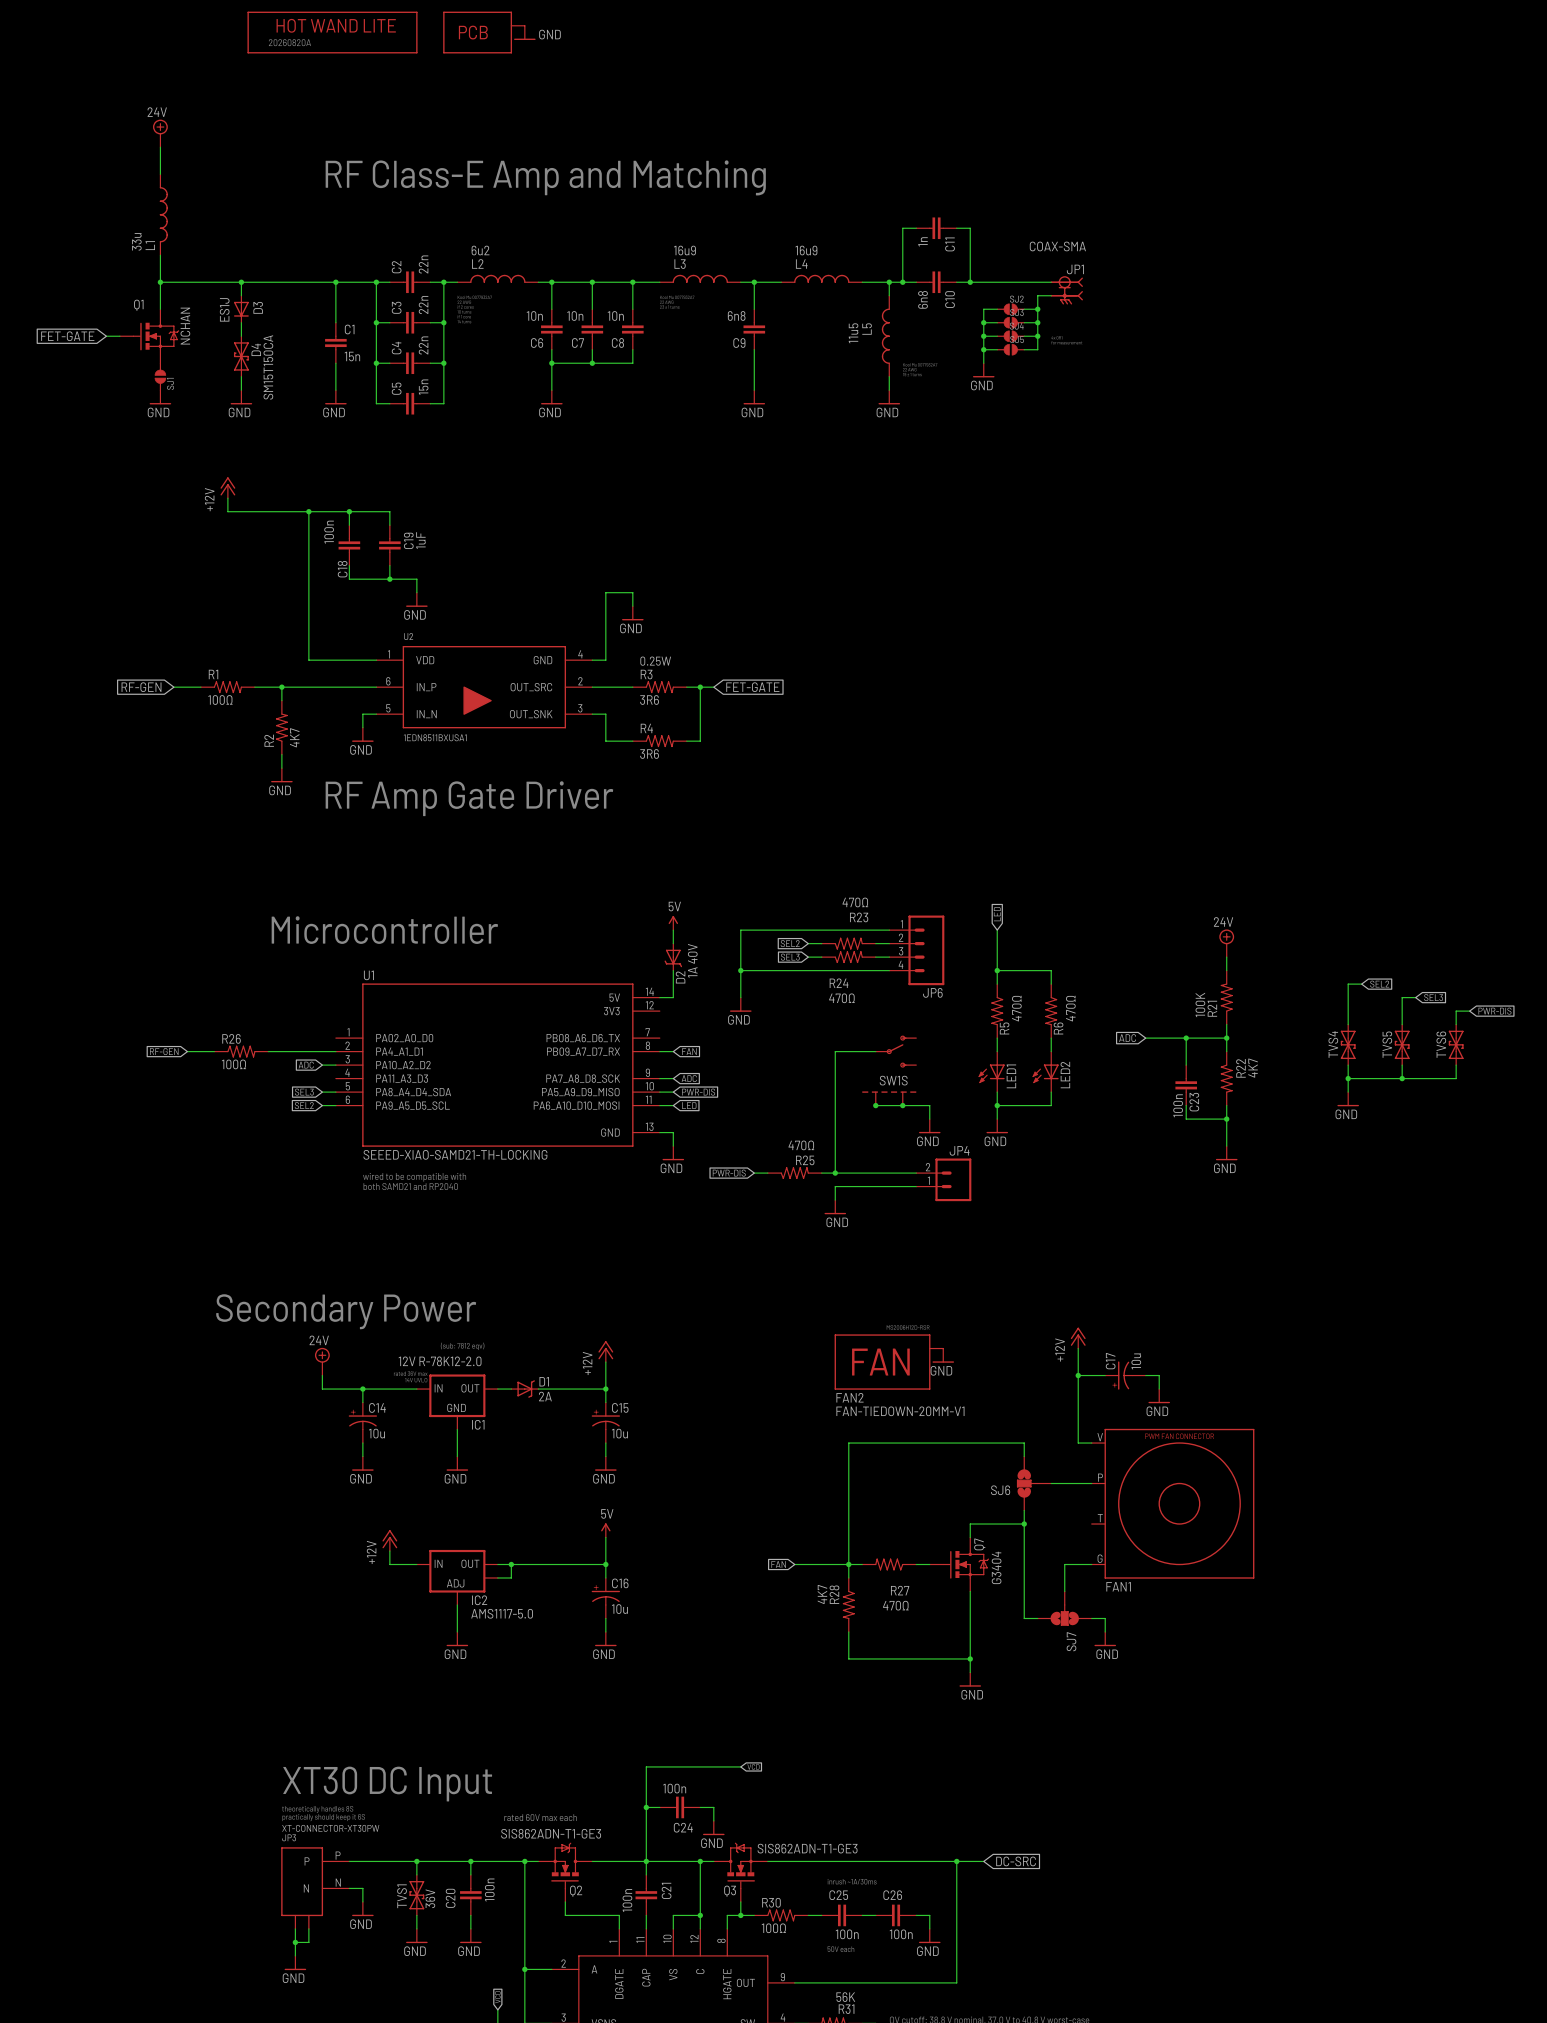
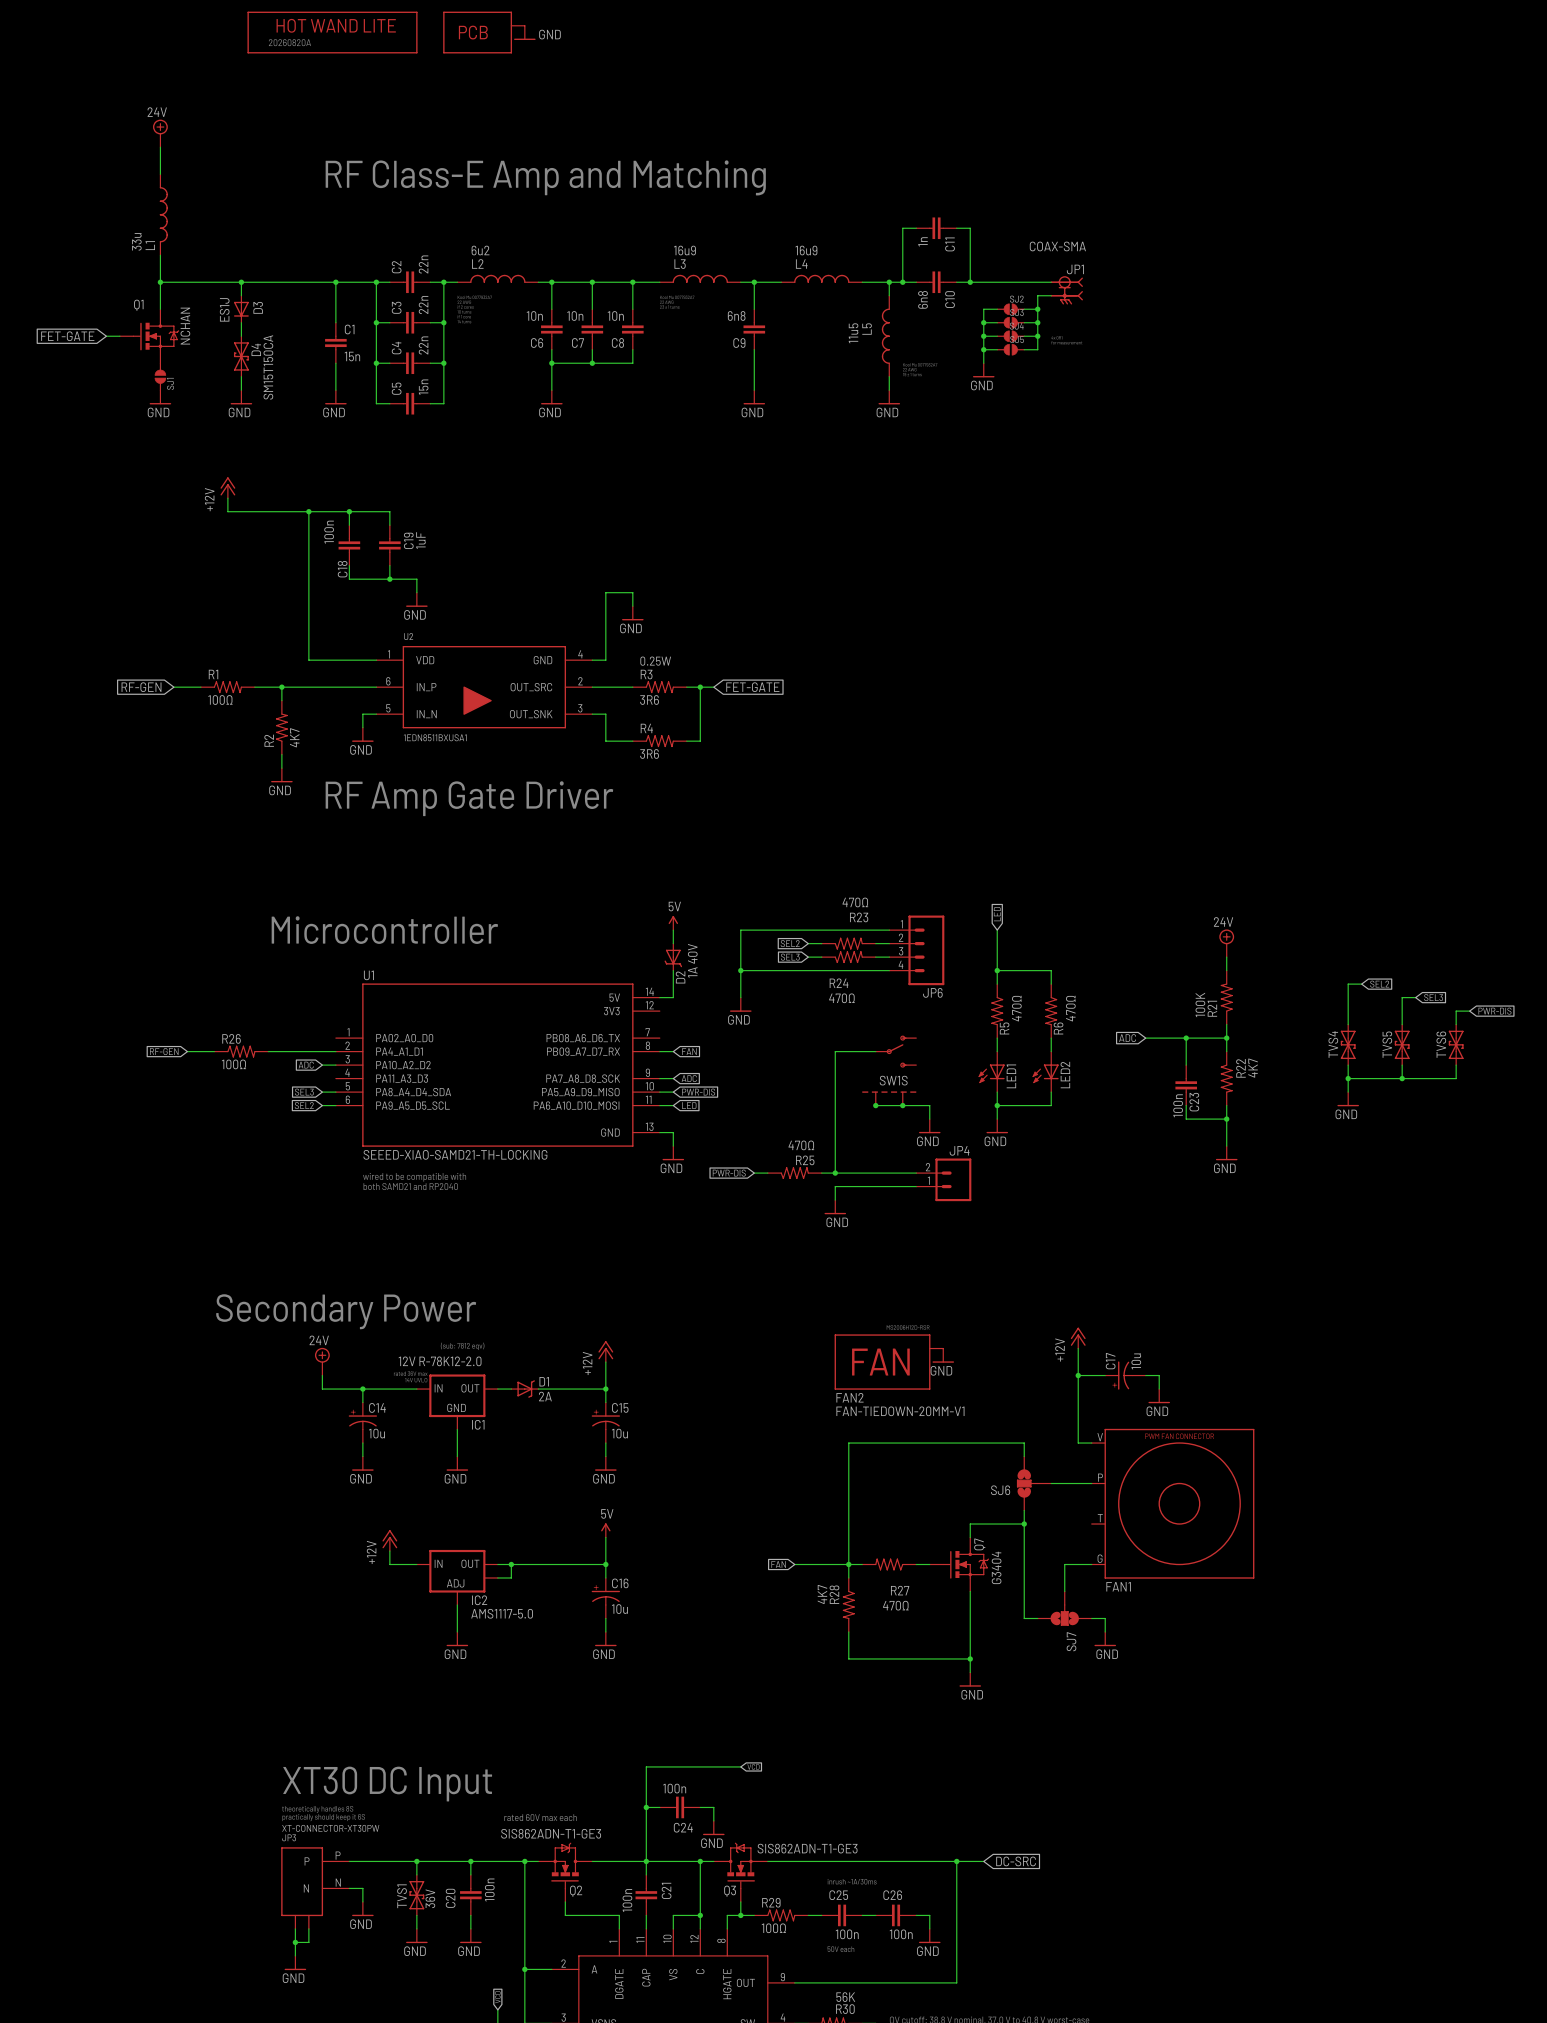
R30 name: R30 (771, 1902) -> R29 (771, 1902)
R31 name: R31 (846, 2009) -> R30 (845, 2009)

